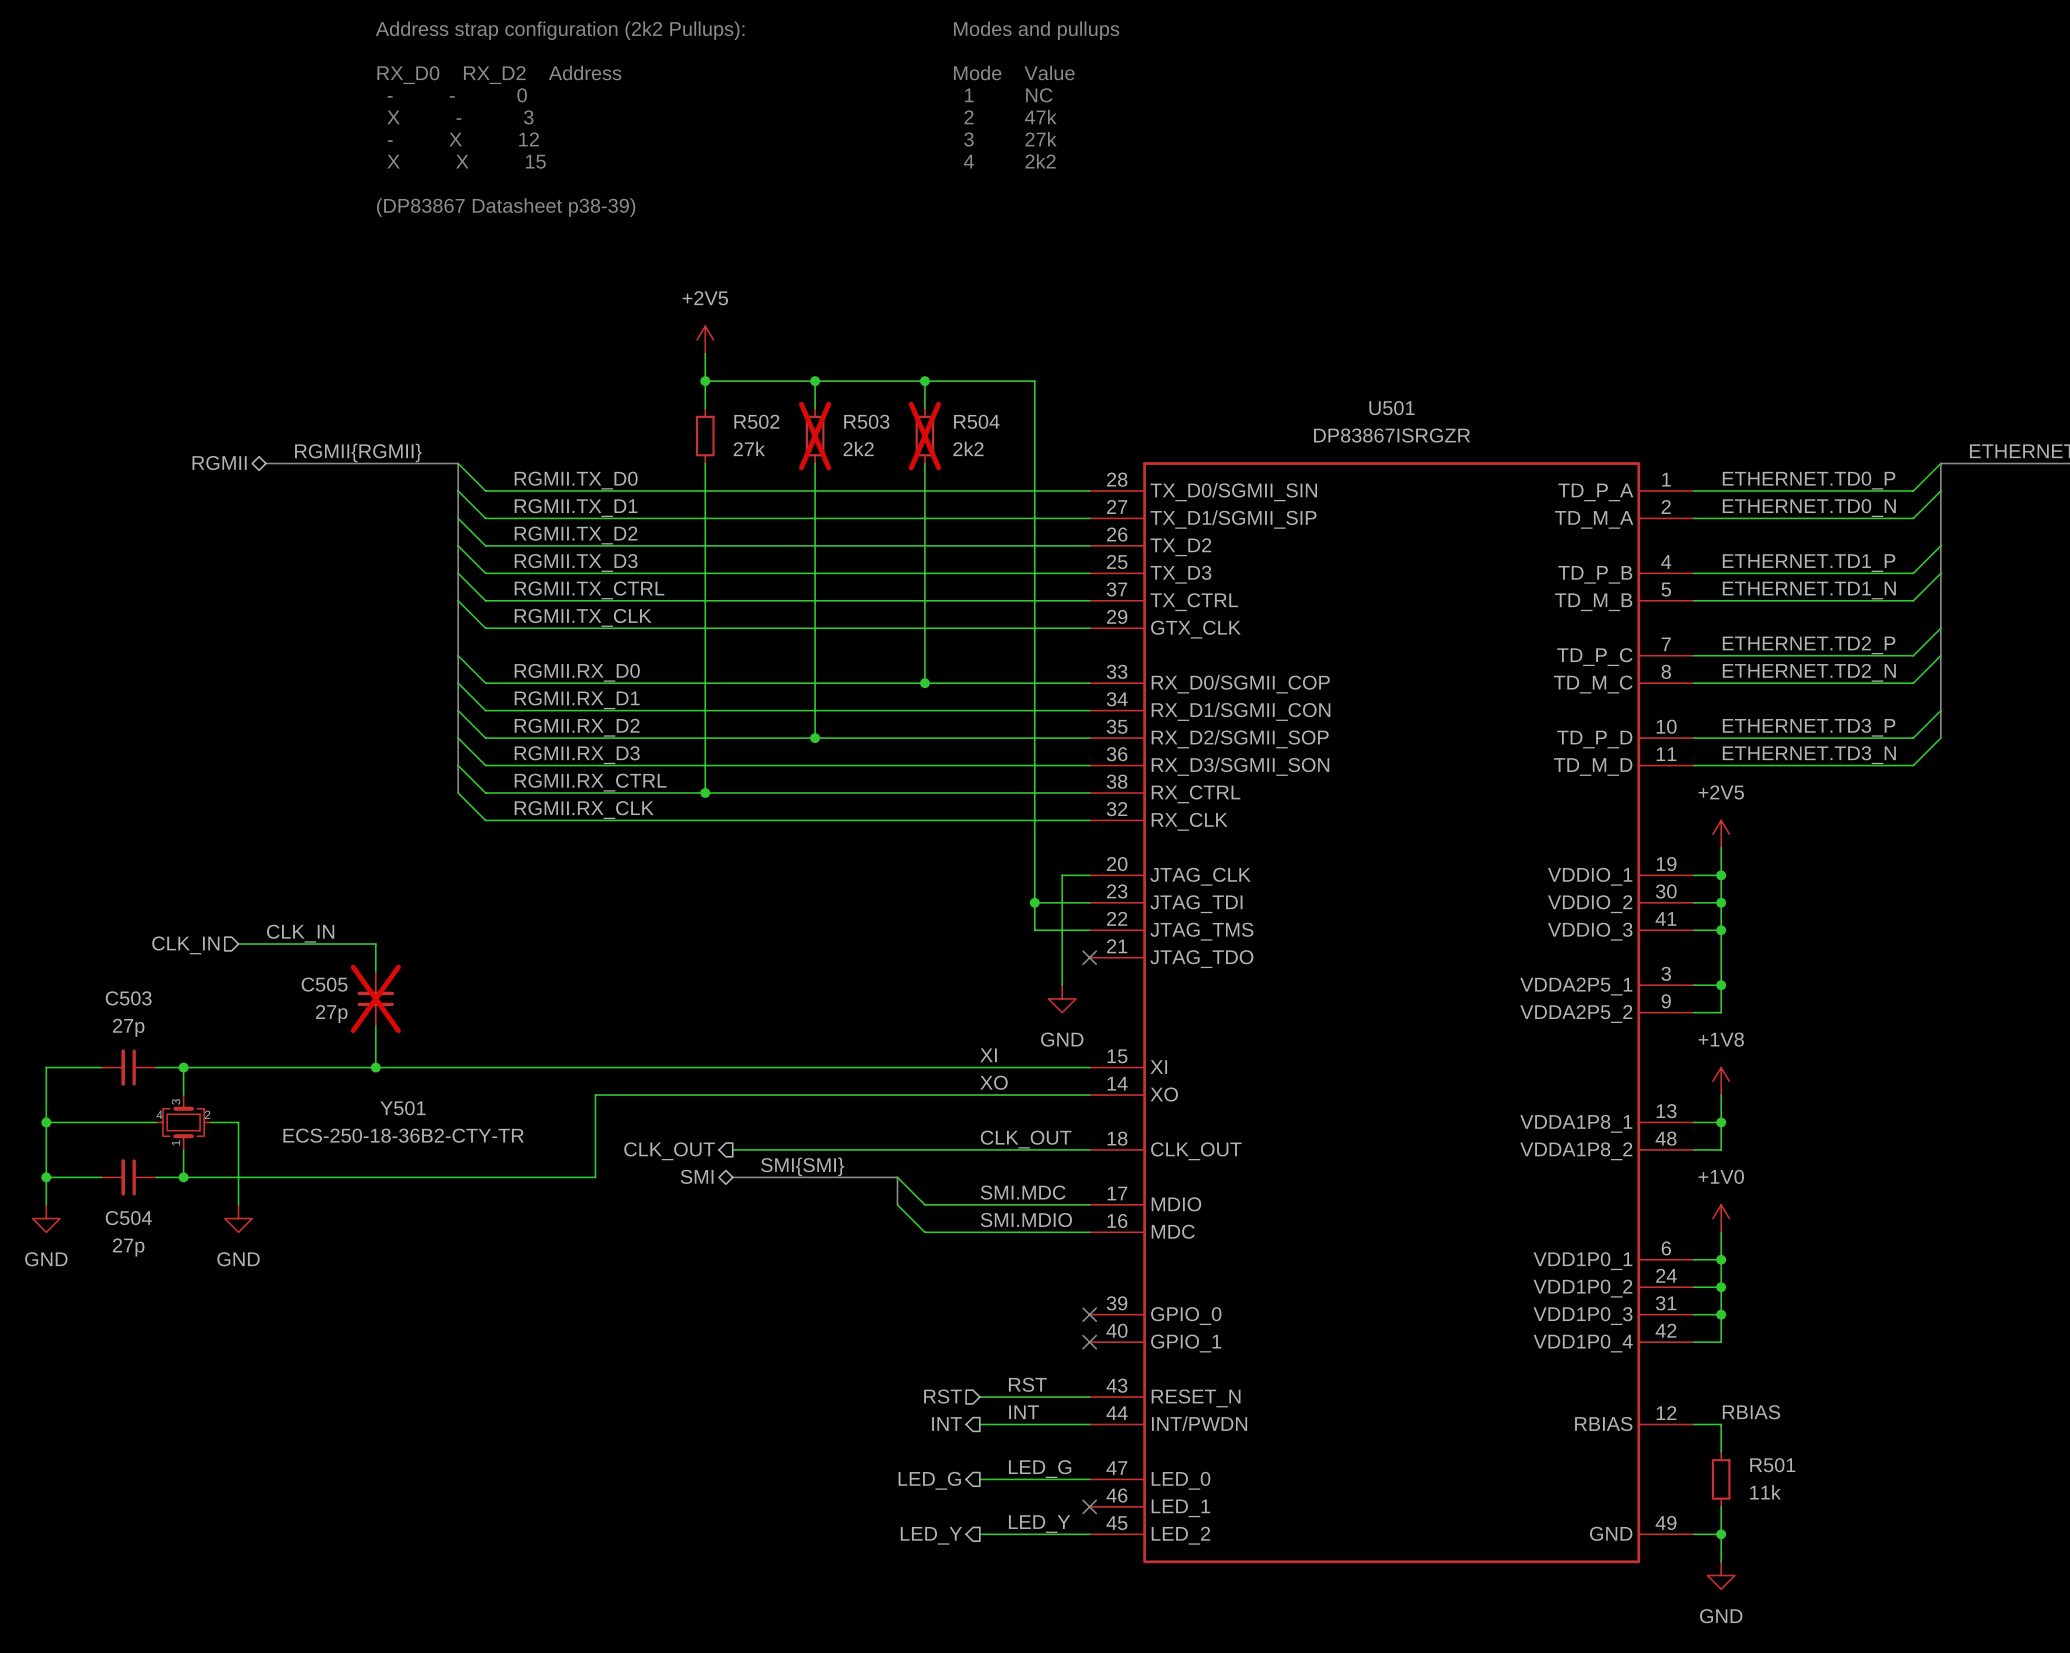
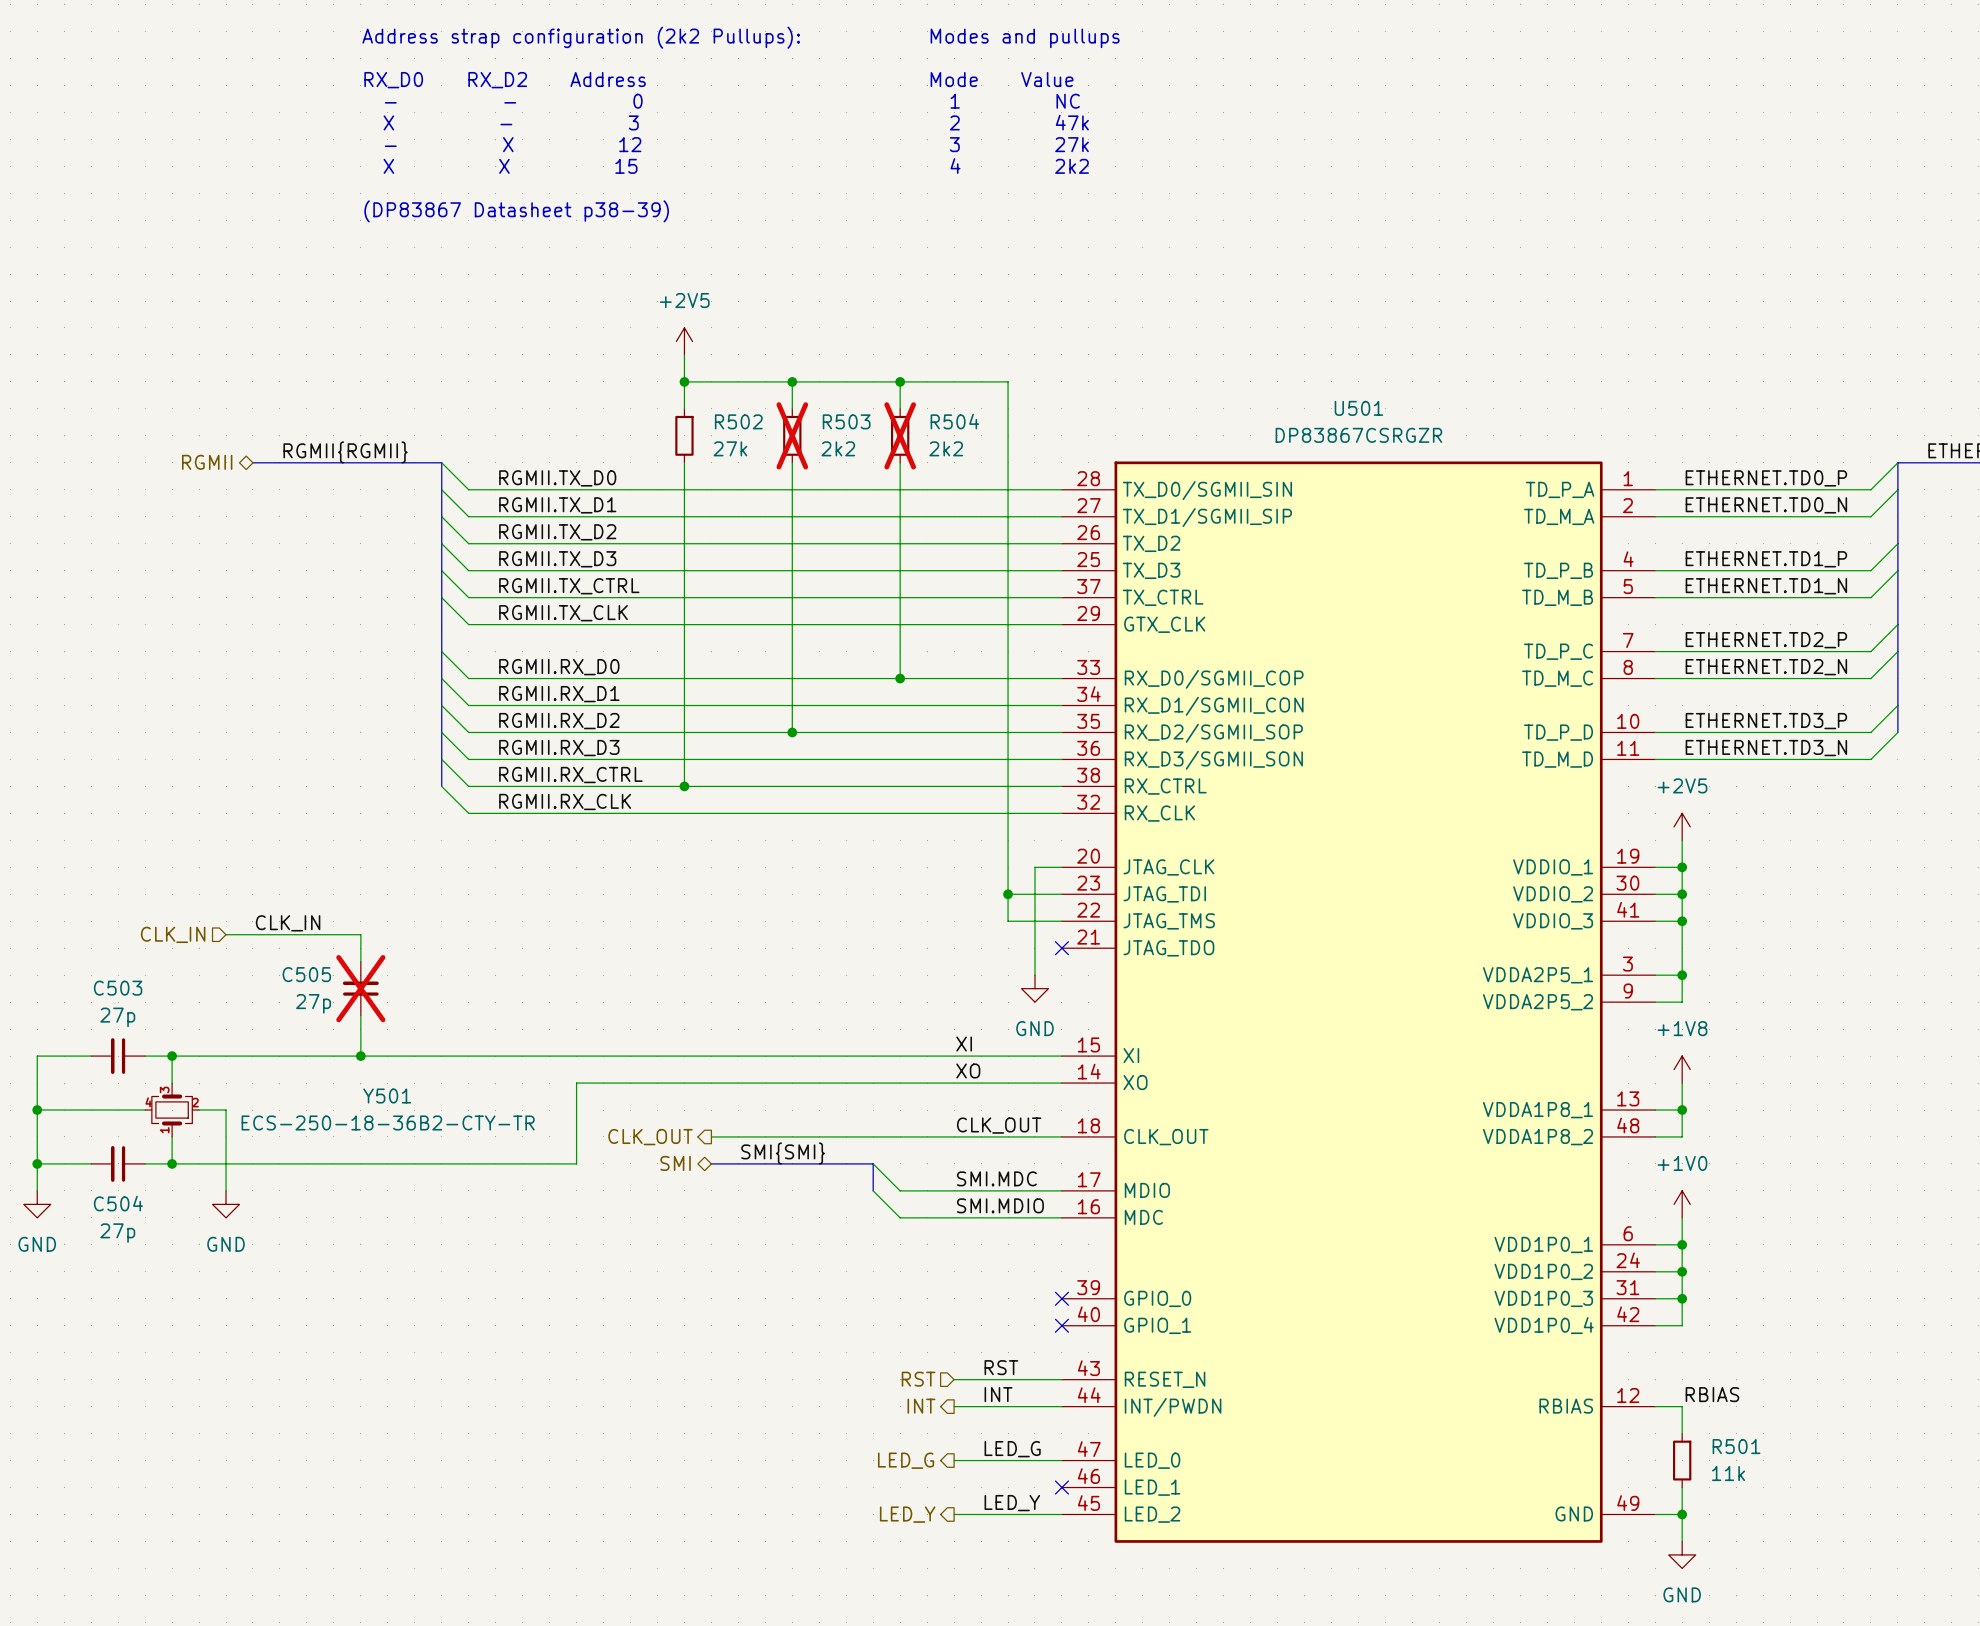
U501 value: DP83867ISRGZR (1392, 435) -> DP83867CSRGZR (1358, 435)

